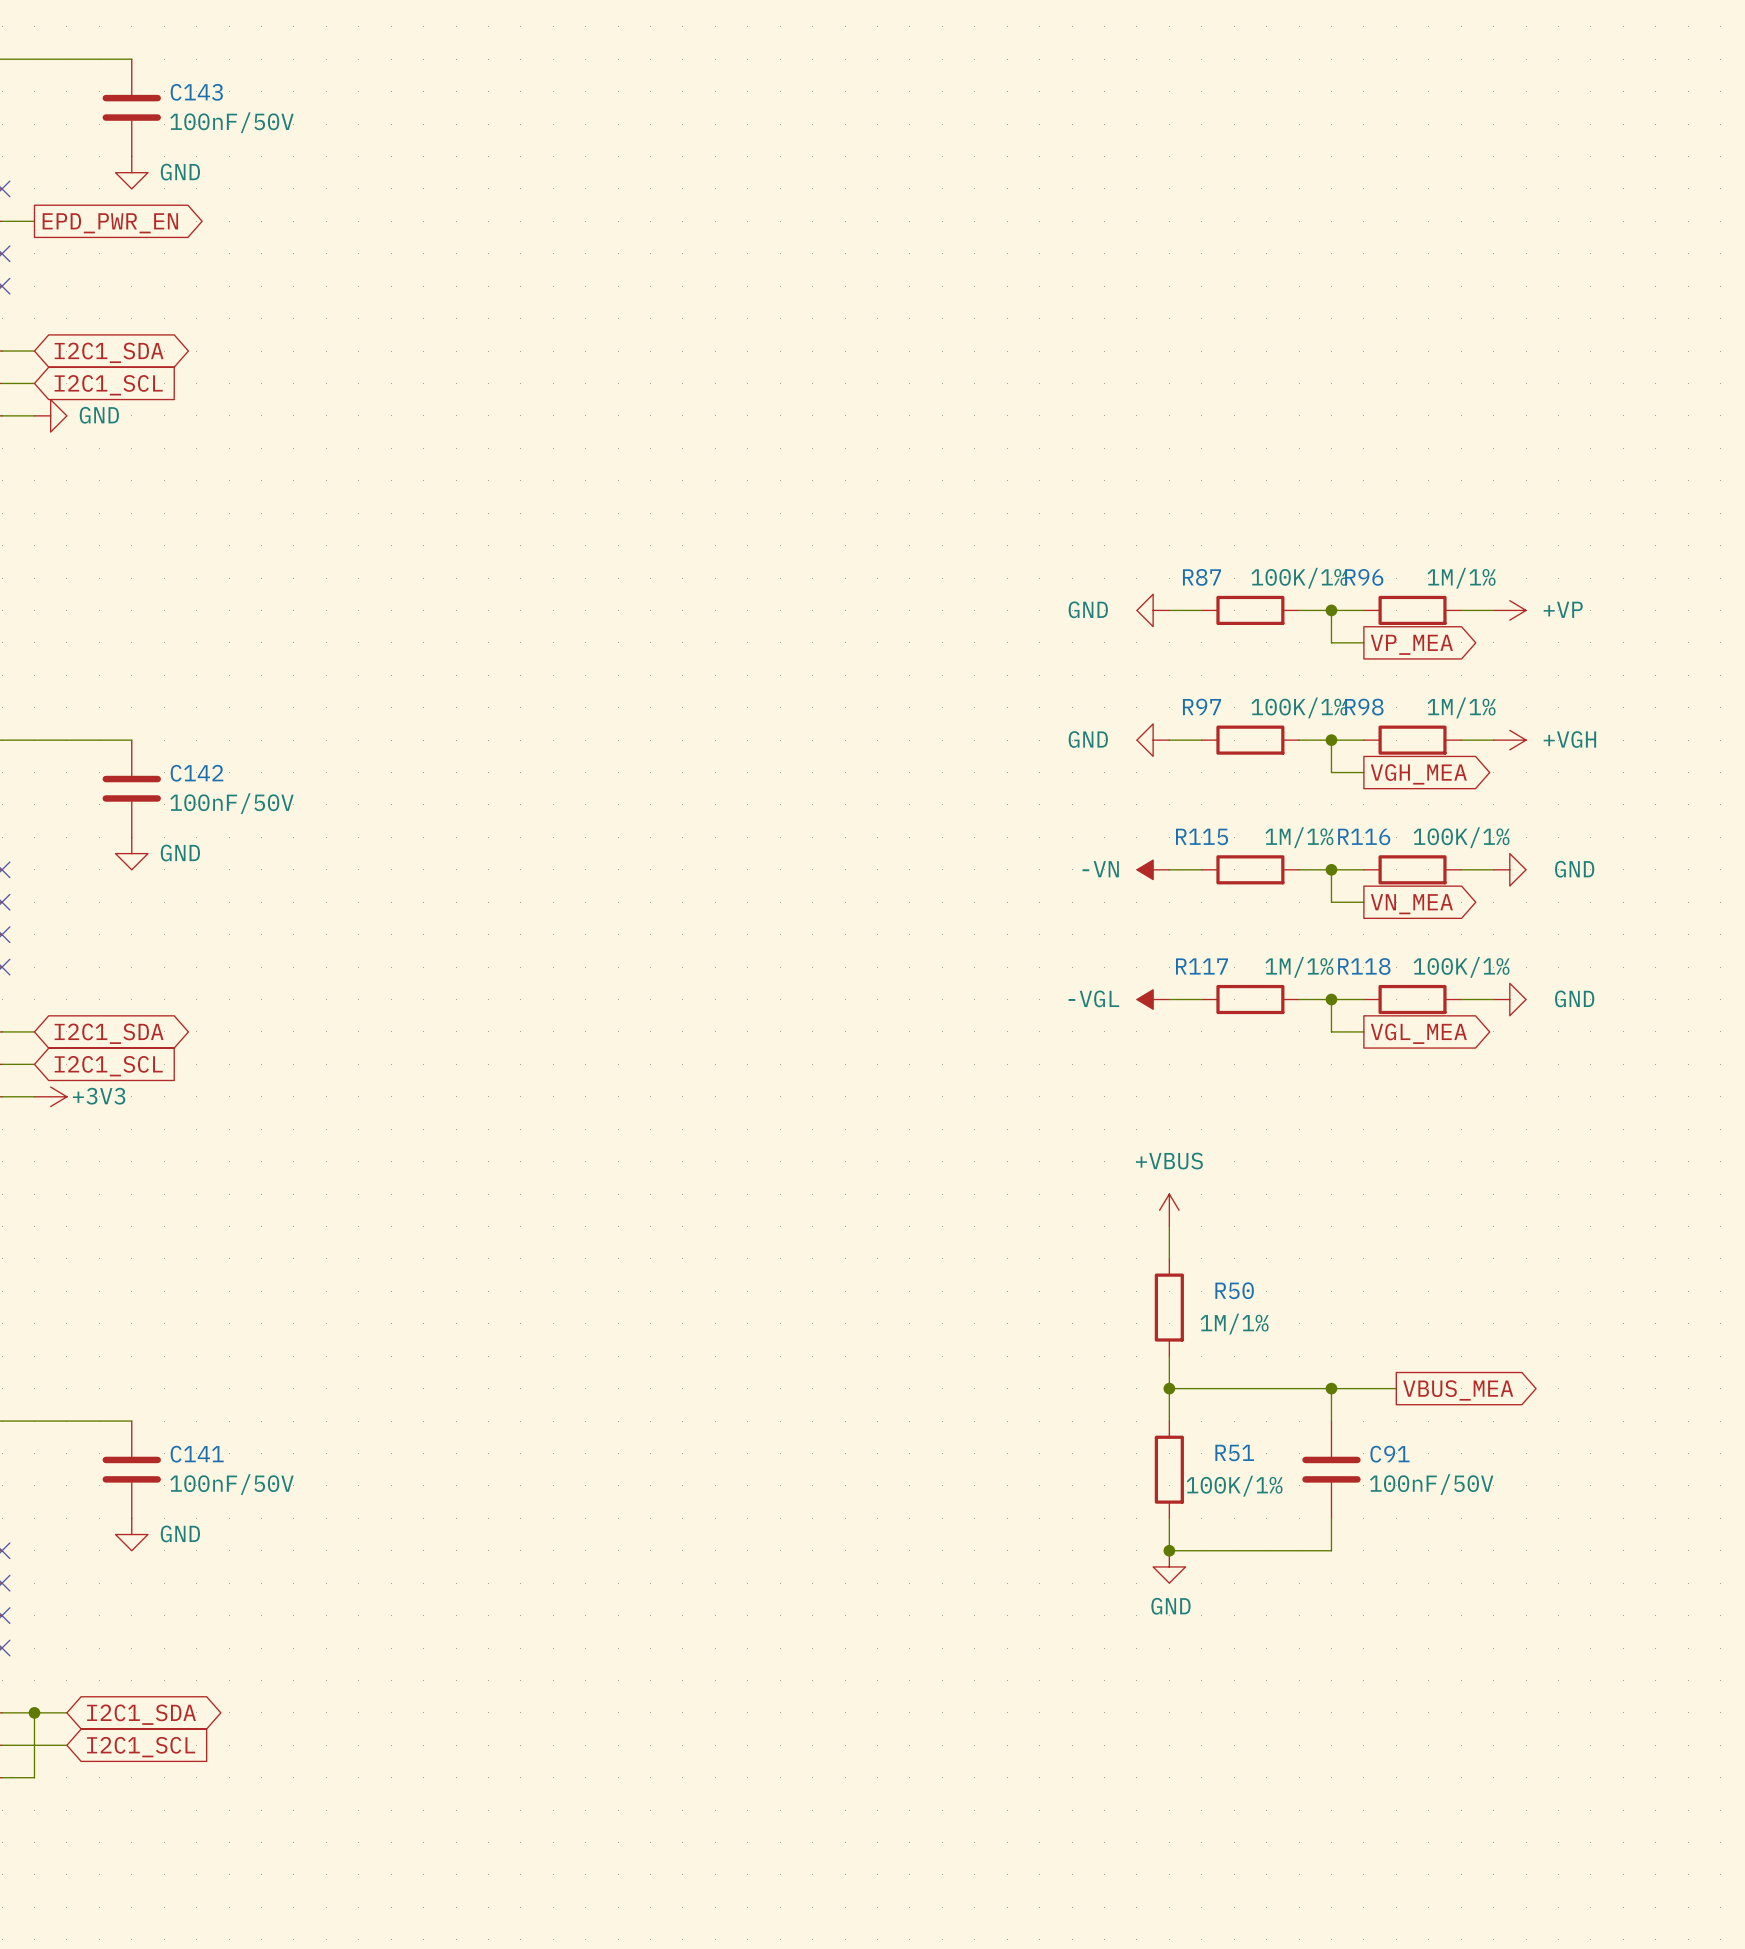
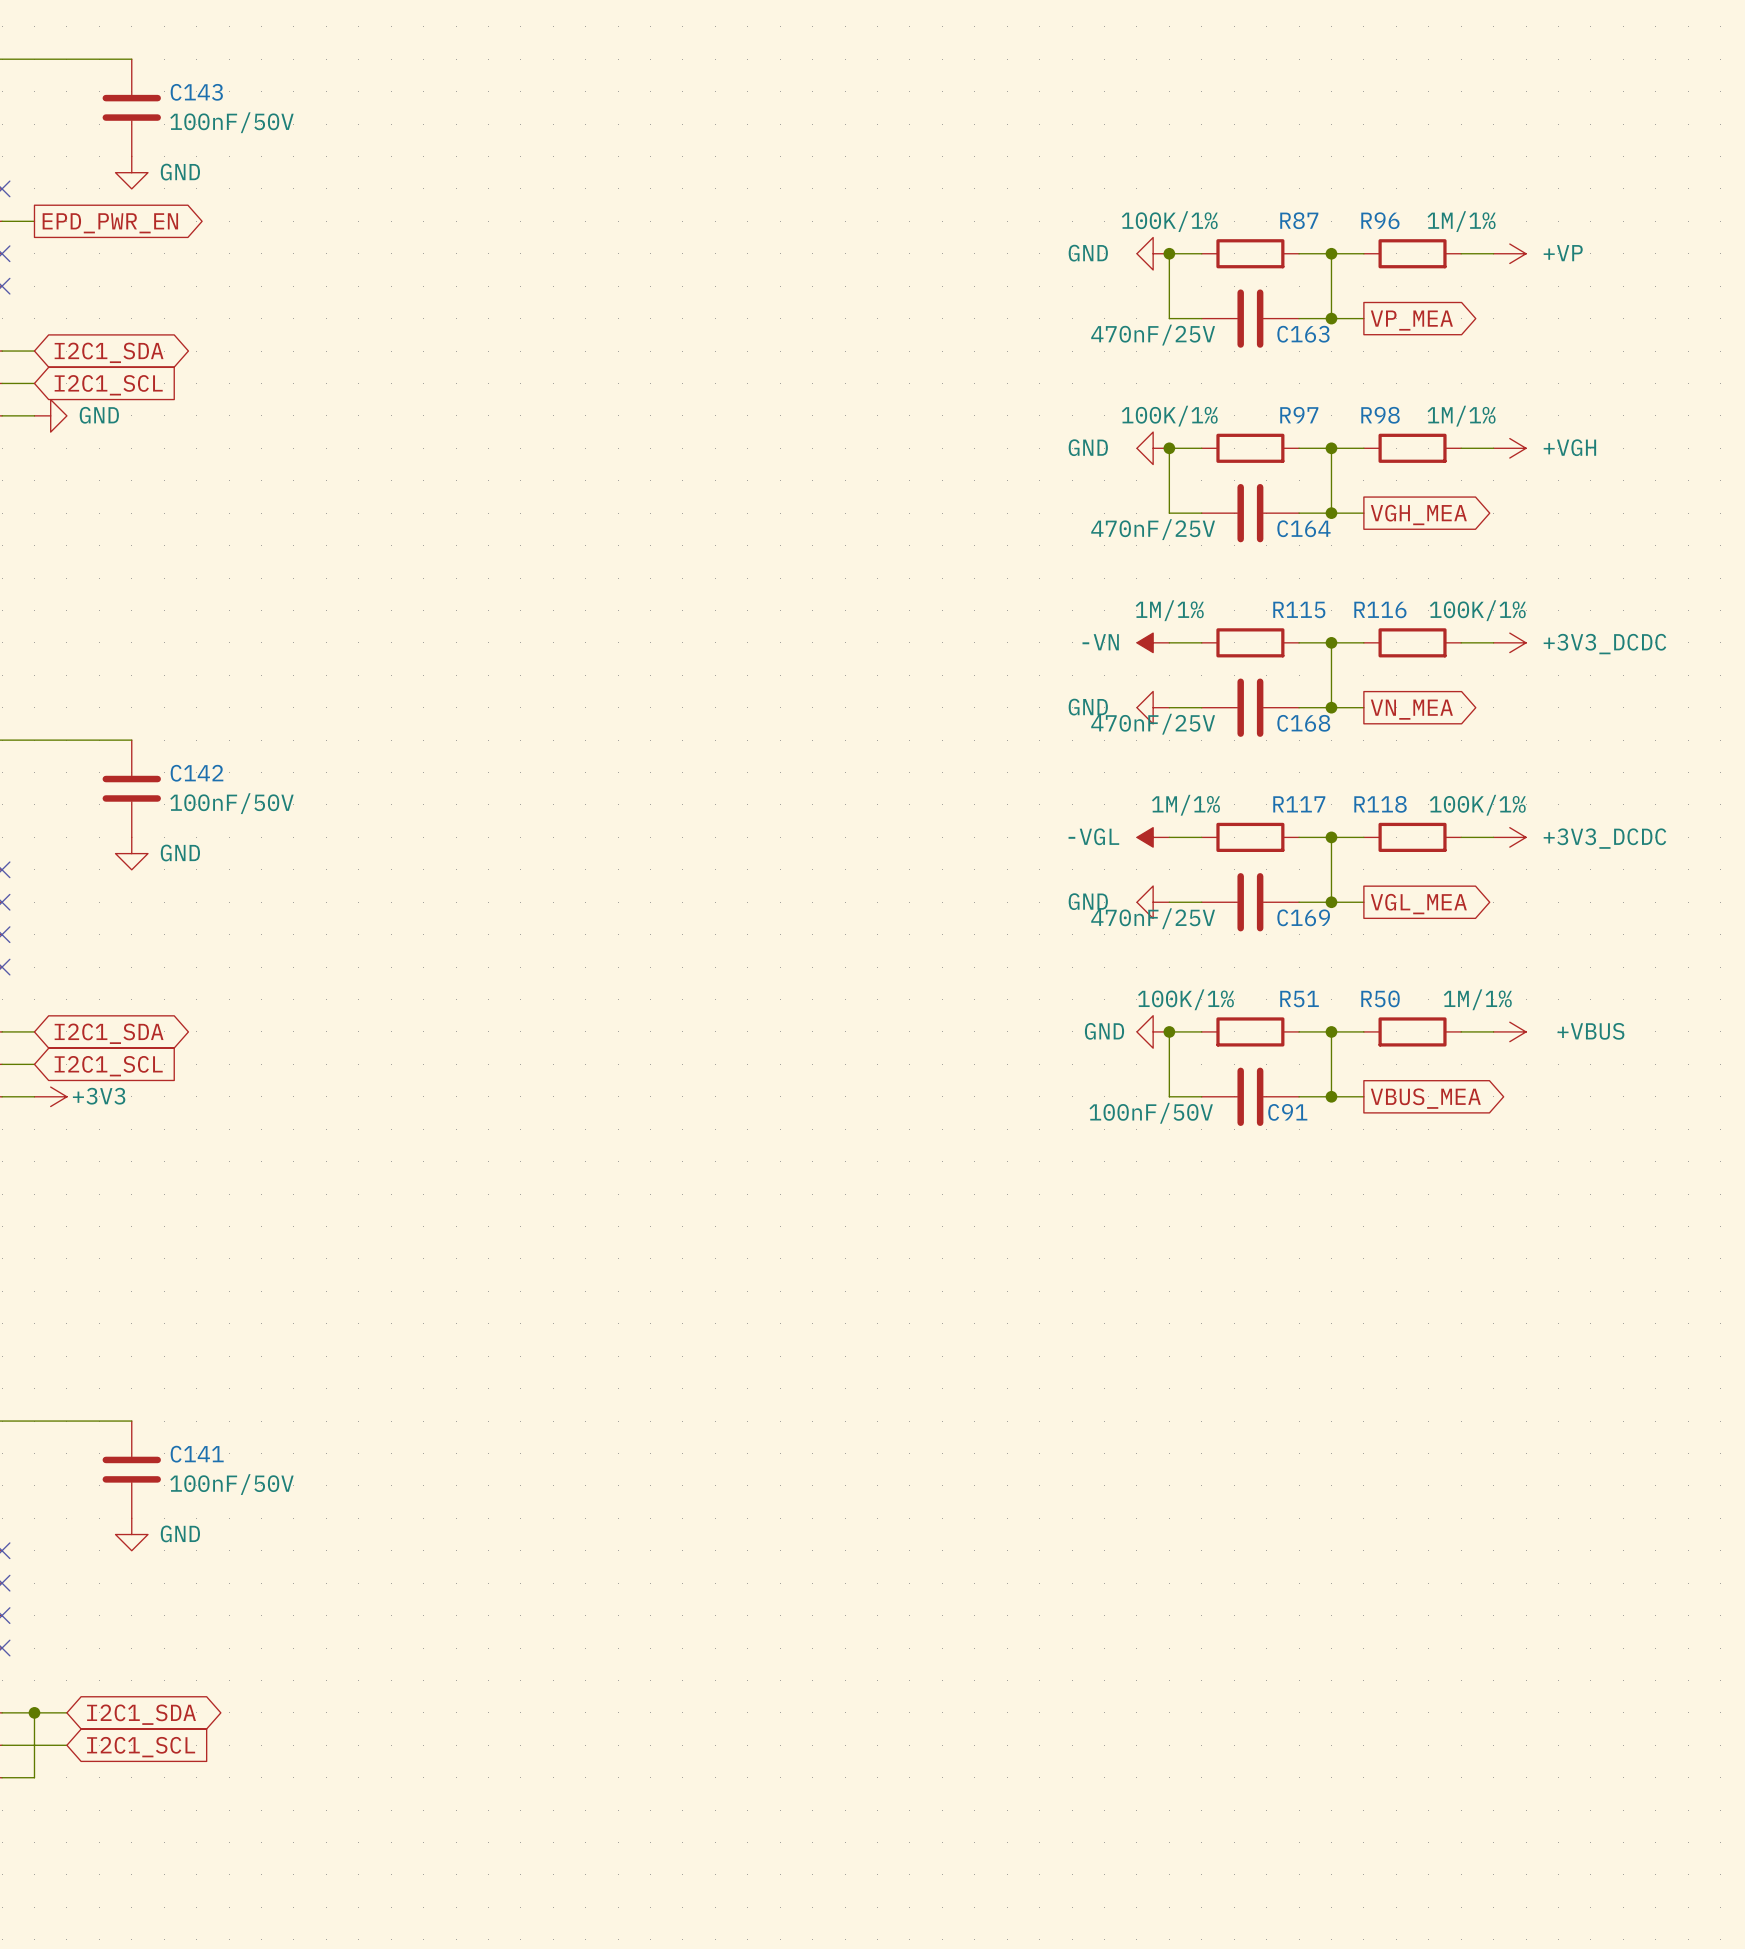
power symbol: none -> GND (1153, 253)
junction: none -> (1169, 253)
wire: none -> (1201, 253) (1169, 253) (1169, 318) (1201, 318)
wire: none -> (1299, 253) (1363, 253)
wire: none -> (1331, 253) (1331, 318)
junction: none -> (1331, 253)
wire: none -> (1461, 253) (1493, 253)
power symbol: none -> +VP (1509, 253)
C163: none -> 470nF/25V (1250, 318)
wire: none -> (1299, 318) (1363, 318)
junction: none -> (1331, 318)
global label: none -> VP_MEA (1411, 320)
power symbol: none -> GND (1153, 448)
junction: none -> (1169, 448)
wire: none -> (1201, 448) (1169, 448) (1169, 513) (1201, 513)
wire: none -> (1331, 448) (1331, 513)
junction: none -> (1331, 448)
C164: none -> 470nF/25V (1250, 513)
junction: none -> (1331, 513)
R87 name position: R87 (1202, 577) -> R87 (1299, 220)
R96 name position: R96 (1364, 577) -> R96 (1380, 220)
R87 value position: 100K/1% (1299, 578) -> 100K/1% (1169, 221)
power symbol: GND (1153, 610) -> none
wire: (1169, 610) (1201, 610) -> (1169, 642) (1201, 642)
R87 position: (1250, 610) -> (1250, 253)
wire: (1299, 610) (1363, 610) -> (1299, 448) (1363, 448)
wire: (1331, 610) (1331, 642) -> none
junction position: (1331, 610) -> (1331, 642)
R96 position: (1412, 610) -> (1412, 253)
wire: (1461, 610) (1493, 610) -> (1461, 448) (1493, 448)
power symbol: +VP (1509, 610) -> none
wire: none -> (1299, 642) (1331, 642) (1331, 707)
power symbol: none -> +3V3_DCDC (1509, 642)
global label: VP_MEA (1411, 644) -> none
R97 name position: R97 (1202, 706) -> R97 (1299, 415)
C168: none -> 470nF/25V (1250, 707)
R97 value position: 100K/1% (1299, 707) -> 100K/1% (1169, 416)
R98 name position: R98 (1364, 707) -> R98 (1380, 415)
global label: none -> VN_MEA (1411, 709)
power symbol position: GND (1153, 740) -> GND (1153, 707)
wire: (1169, 740) (1201, 740) -> (1169, 902) (1201, 902)
R97 position: (1250, 740) -> (1250, 448)
wire: (1299, 740) (1363, 740) -> (1299, 513) (1363, 513)
wire: (1331, 740) (1331, 772) (1363, 772) -> none
junction position: (1331, 740) -> (1331, 707)
R98 position: (1412, 740) -> (1412, 448)
wire: (1461, 740) (1493, 740) -> (1461, 642) (1493, 642)
power symbol position: +VGH (1509, 740) -> +VGH (1509, 448)
global label position: VGH_MEA (1418, 774) -> VGH_MEA (1418, 514)
R115 name position: R115 (1202, 836) -> R115 (1299, 609)
R116 name position: R116 (1364, 836) -> R116 (1380, 609)
R115 value position: 1M/1% (1299, 837) -> 1M/1% (1169, 610)
junction: none -> (1331, 837)
R116 value position: 100K/1% (1461, 837) -> 100K/1% (1477, 610)
power symbol: none -> +3V3_DCDC (1509, 837)
power symbol position: -VN (1153, 869) -> -VN (1153, 642)
wire: (1169, 869) (1201, 869) -> (1169, 707) (1201, 707)
R115 position: (1250, 869) -> (1250, 642)
wire: (1299, 869) (1363, 869) -> (1299, 707) (1363, 707)
junction: (1331, 869) -> none
R116 position: (1412, 869) -> (1412, 642)
wire: (1461, 869) (1493, 869) -> (1461, 1031) (1493, 1031)
power symbol: GND (1509, 869) -> none
power symbol: none -> GND (1153, 902)
C169: none -> 470nF/25V (1250, 902)
wire: none -> (1299, 902) (1331, 902)
junction: none -> (1331, 902)
global label: VN_MEA (1411, 904) -> VGL_MEA (1418, 904)
R117 name position: R117 (1202, 966) -> R117 (1299, 804)
R118 name position: R118 (1364, 966) -> R118 (1380, 804)
R117 value position: 1M/1% (1299, 967) -> 1M/1% (1185, 805)
R118 value position: 100K/1% (1461, 967) -> 100K/1% (1477, 805)
power symbol position: -VGL (1153, 999) -> -VGL (1153, 837)
wire: (1169, 999) (1201, 999) -> (1169, 837) (1201, 837)
R117 position: (1250, 999) -> (1250, 837)
wire: (1299, 999) (1363, 999) -> (1299, 837) (1363, 837)
wire: (1331, 999) (1331, 1031) -> (1331, 837) (1331, 869)
junction position: (1331, 999) -> (1331, 1031)
R118 position: (1412, 999) -> (1412, 837)
wire: (1461, 999) (1493, 999) -> (1461, 837) (1493, 837)
power symbol: GND (1509, 999) -> none
power symbol: none -> GND (1153, 1031)
junction: none -> (1169, 1031)
wire: none -> (1201, 1031) (1169, 1031) (1169, 1096) (1201, 1096)
wire: none -> (1299, 1031) (1331, 1031) (1331, 1096)
power symbol: none -> +VBUS (1509, 1031)
global label: VGL_MEA (1418, 1033) -> none
wire: none -> (1299, 1096) (1363, 1096)
junction: none -> (1331, 1096)
power symbol: +VBUS (1169, 1210) -> none
wire: (1169, 1226) (1169, 1258) -> none
R50 name position: R50 (1234, 1290) -> R50 (1380, 998)
R50 rotation: 0° (1169, 1307) -> 90° clockwise (1412, 1031)
R50 position: (1169, 1307) -> (1412, 1031)
R50 value position: 1M/1% (1234, 1324) -> 1M/1% (1477, 999)
wire: (1169, 1356) (1169, 1421) -> none
wire: (1169, 1388) (1396, 1388) -> none
junction: (1169, 1388) -> none
wire: (1331, 1388) (1331, 1421) -> none
junction: (1331, 1388) -> none
global label position: VBUS_MEA (1458, 1390) -> VBUS_MEA (1425, 1098)
C91 name position: C91 (1389, 1454) -> C91 (1287, 1112)
R51 rotation: 0° (1169, 1469) -> 90° clockwise (1250, 1031)
R51 position: (1169, 1469) -> (1250, 1031)
C91 rotation: 0° (1331, 1469) -> 90° clockwise (1250, 1096)
C91 position: (1331, 1469) -> (1250, 1096)
C91 value position: 100nF/50V (1431, 1484) -> 100nF/50V (1151, 1113)
R51 value position: 100K/1% (1234, 1486) -> 100K/1% (1185, 999)
wire: (1169, 1518) (1169, 1550) (1331, 1550) (1331, 1518) -> none
junction: (1169, 1550) -> none
power symbol: GND (1169, 1566) -> none

